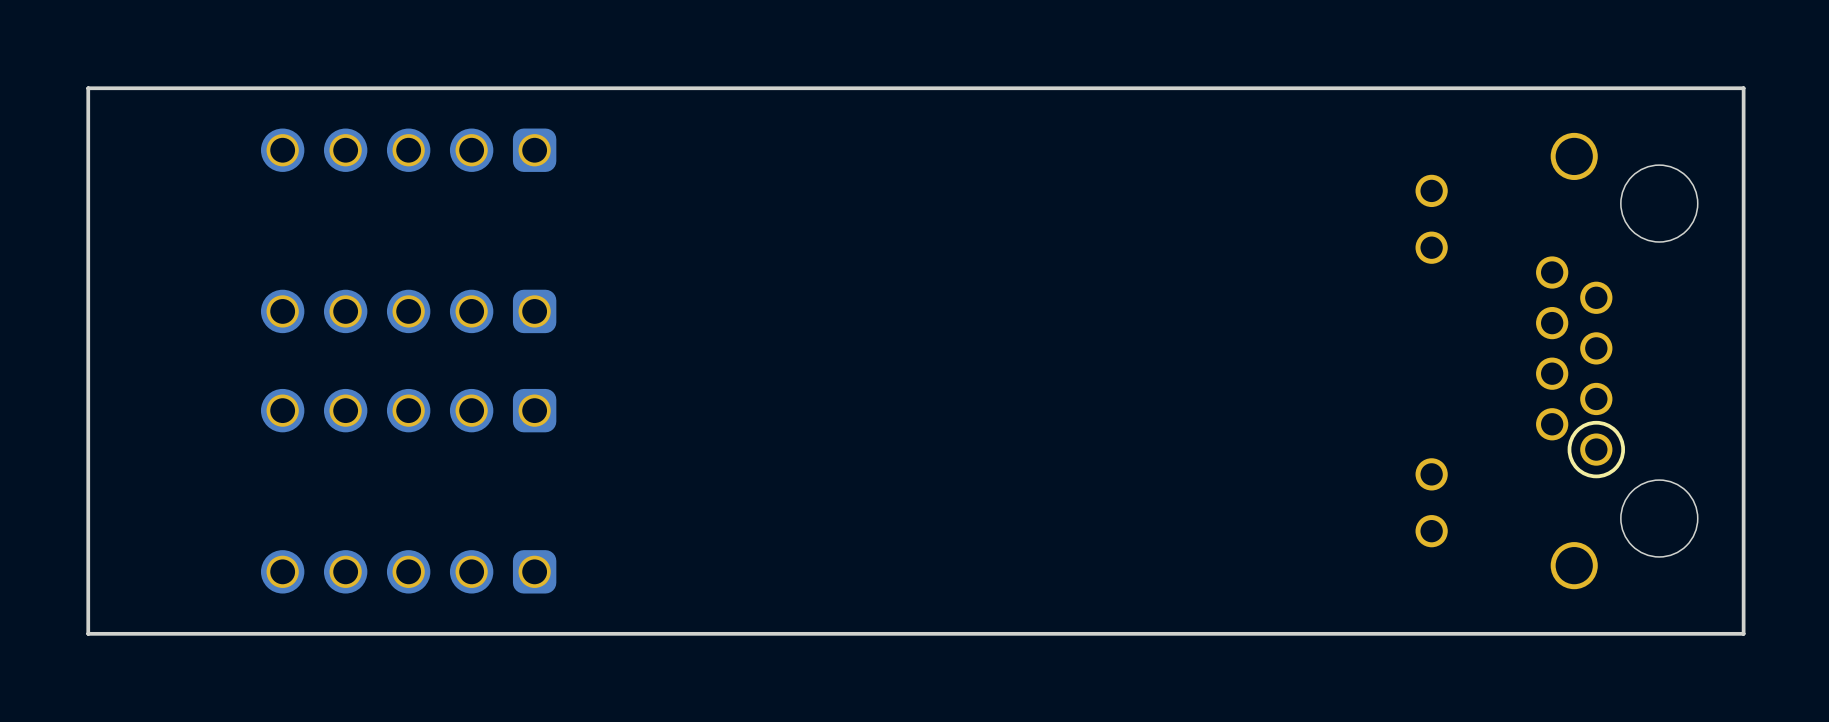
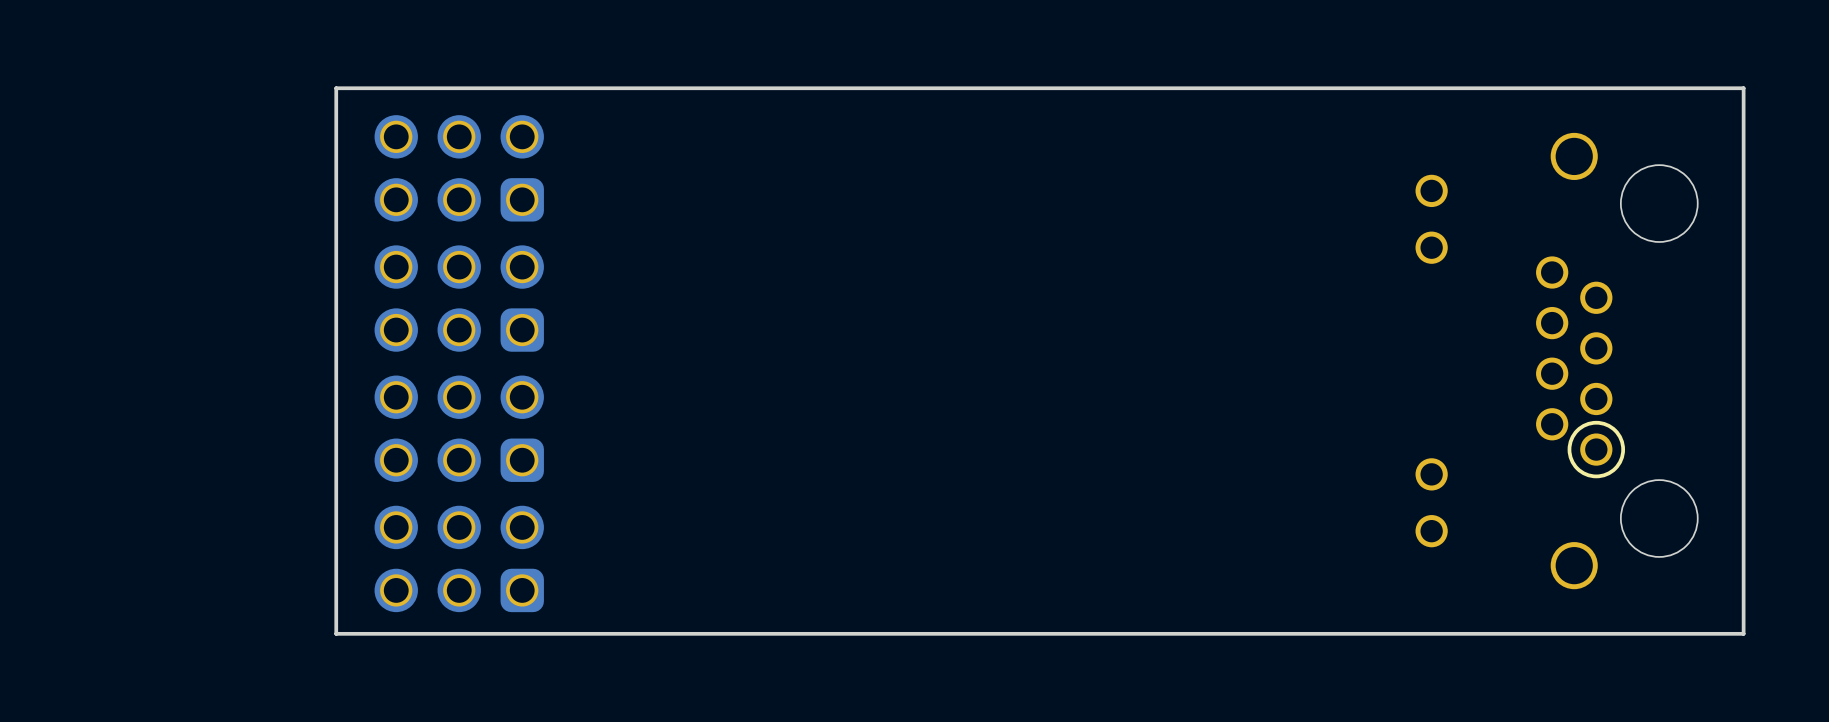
board edge: (336, 88) (88, 88) (88, 633) (336, 633) -> (336, 88) (336, 633)
part: (408, 150) -> none
part: none -> (459, 168)
part: none -> (459, 298)
part: (408, 311) -> none
part: (408, 410) -> none
part: none -> (459, 428)
part: none -> (459, 558)
part: (408, 571) -> none

